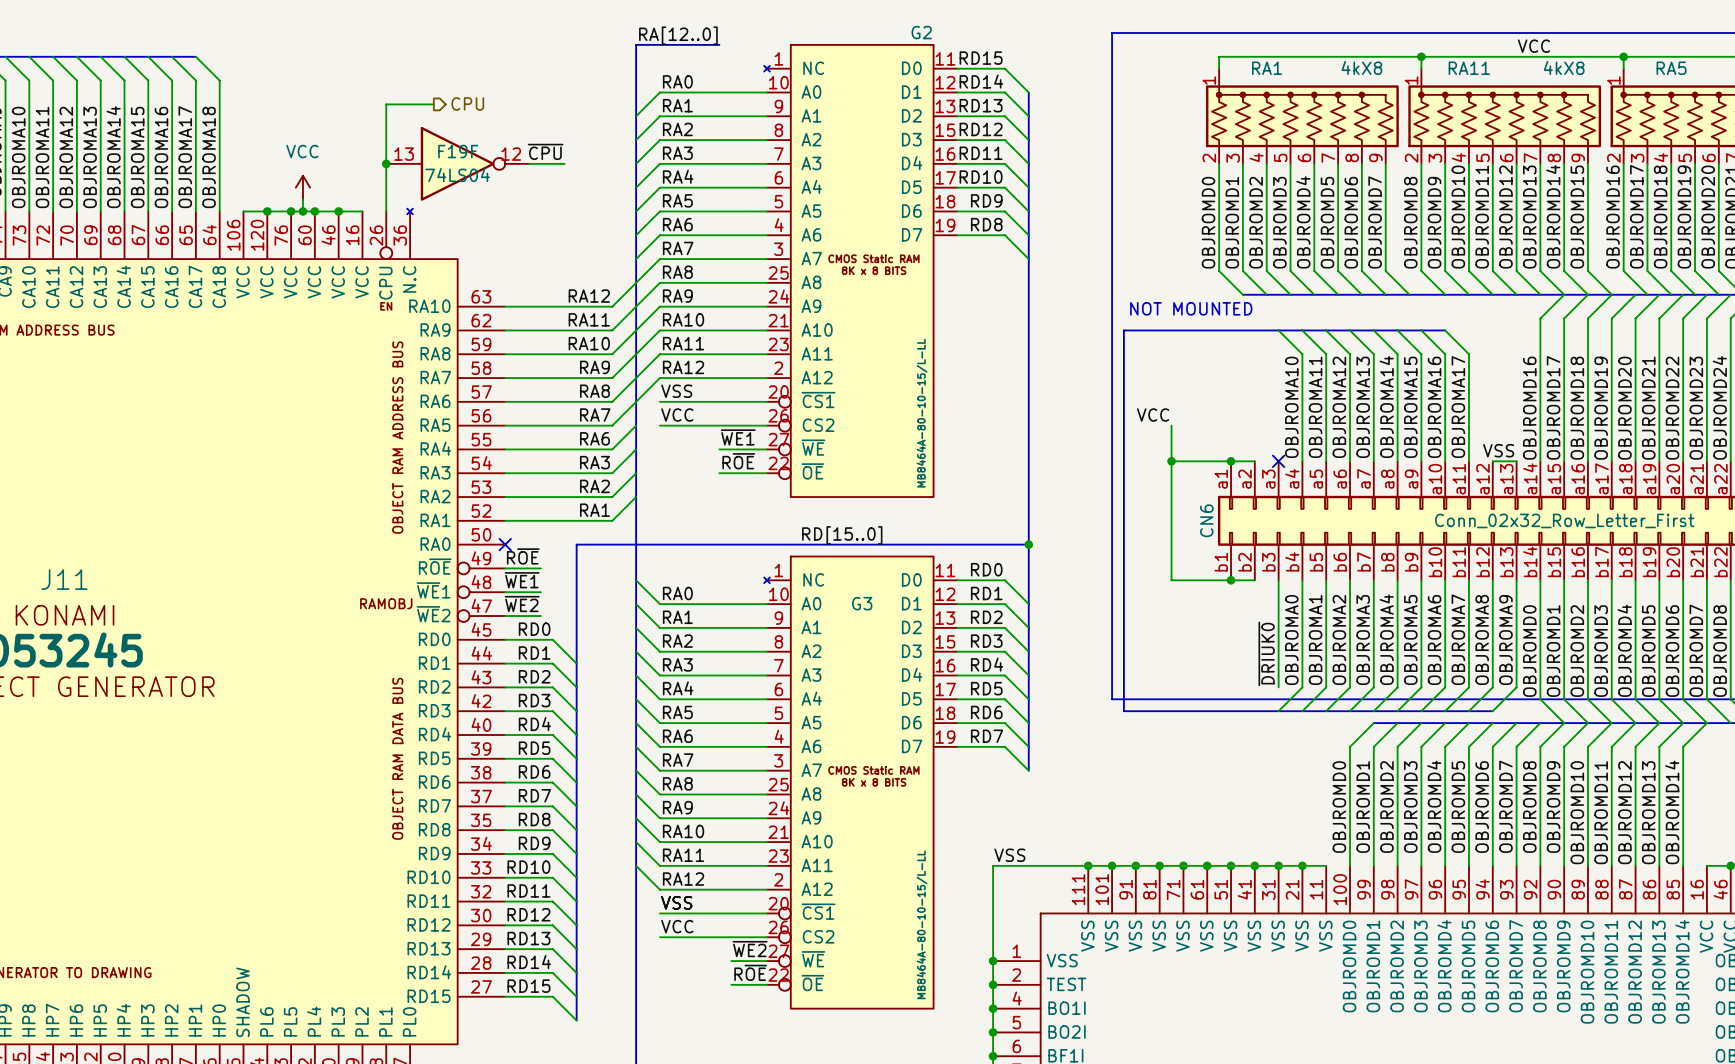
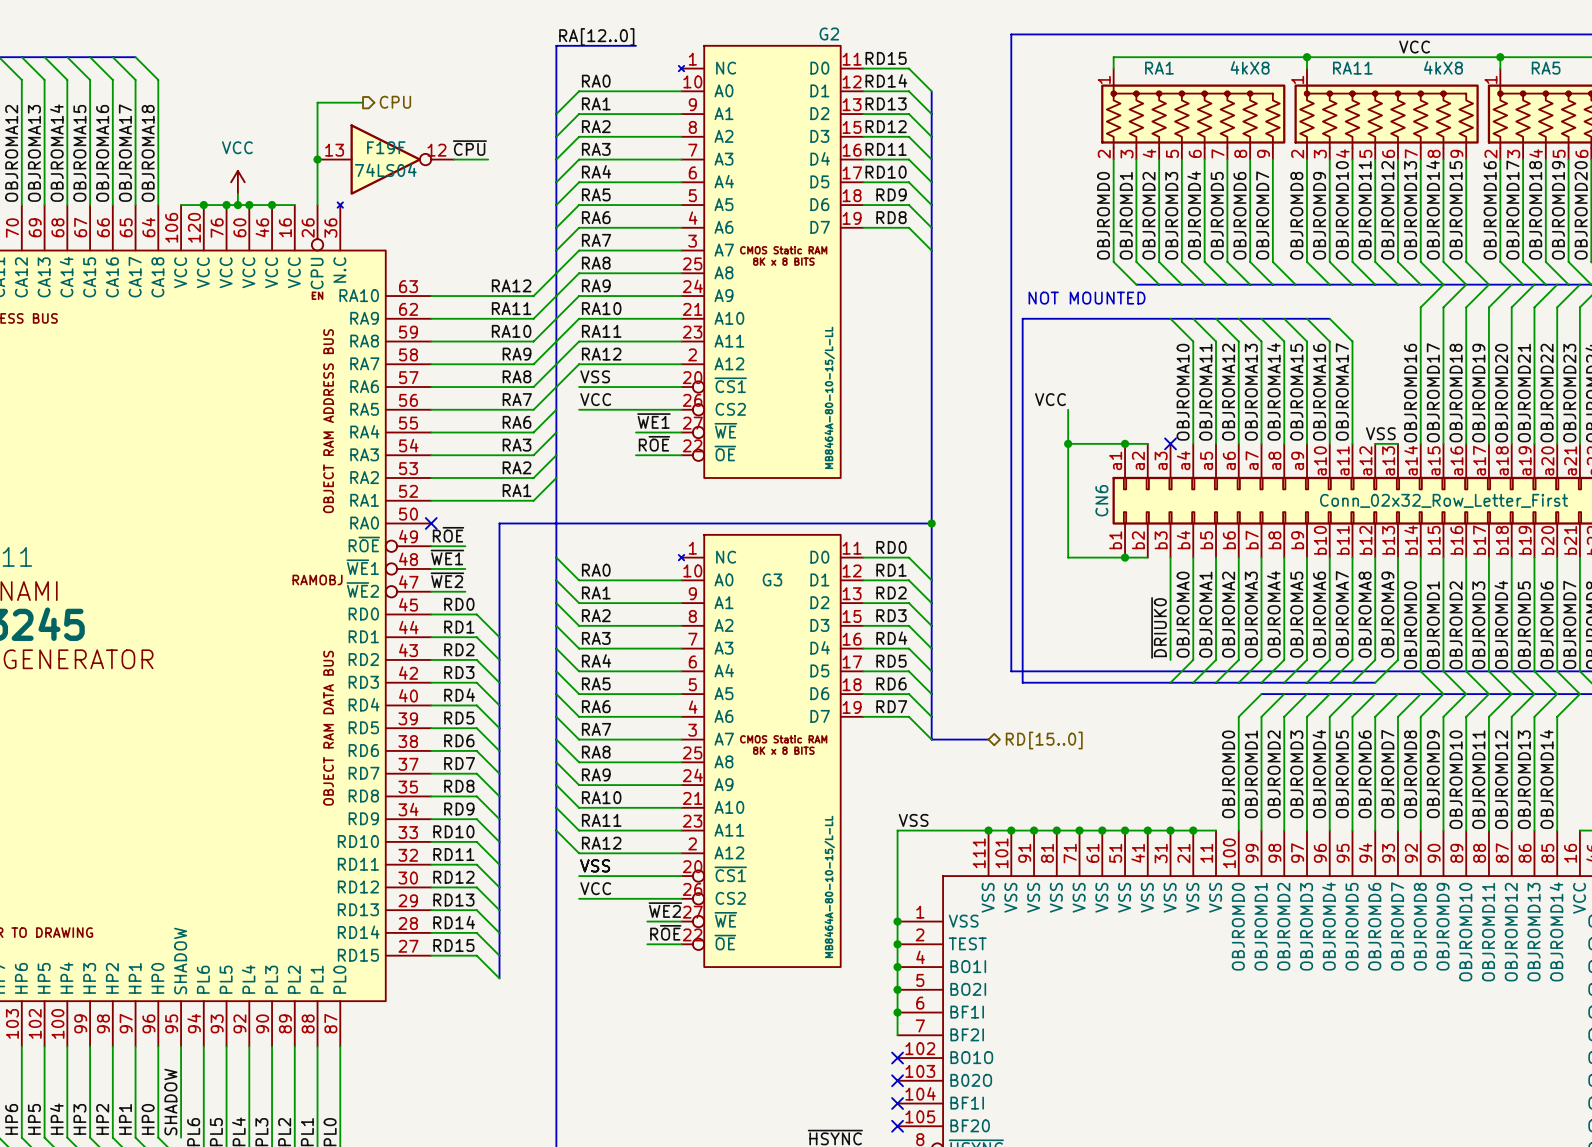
label: RD[15..0] (842, 535) -> none
bus: none -> (931, 739) (988, 739)
hierarchical label: none -> RD[15..0] (1044, 740)

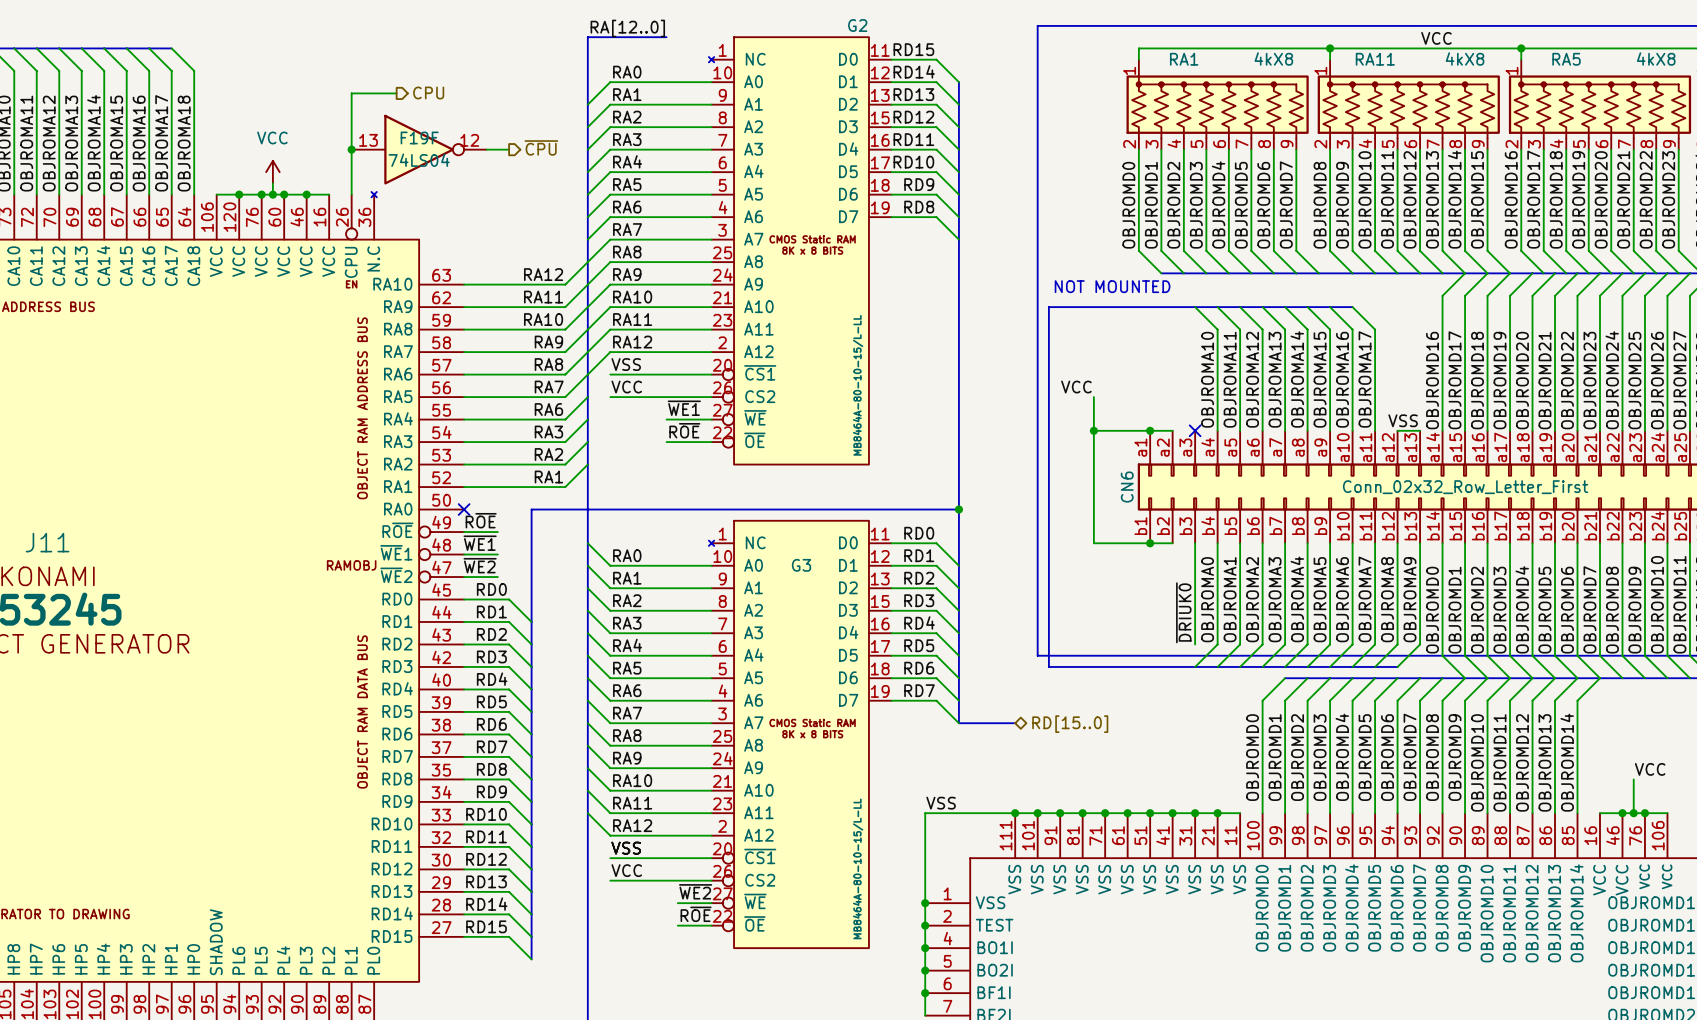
label: ~{CPU} (469, 148) -> none
hierarchical label: none -> ~{CPU} (541, 147)
wire: (476, 159) (488, 159) -> none

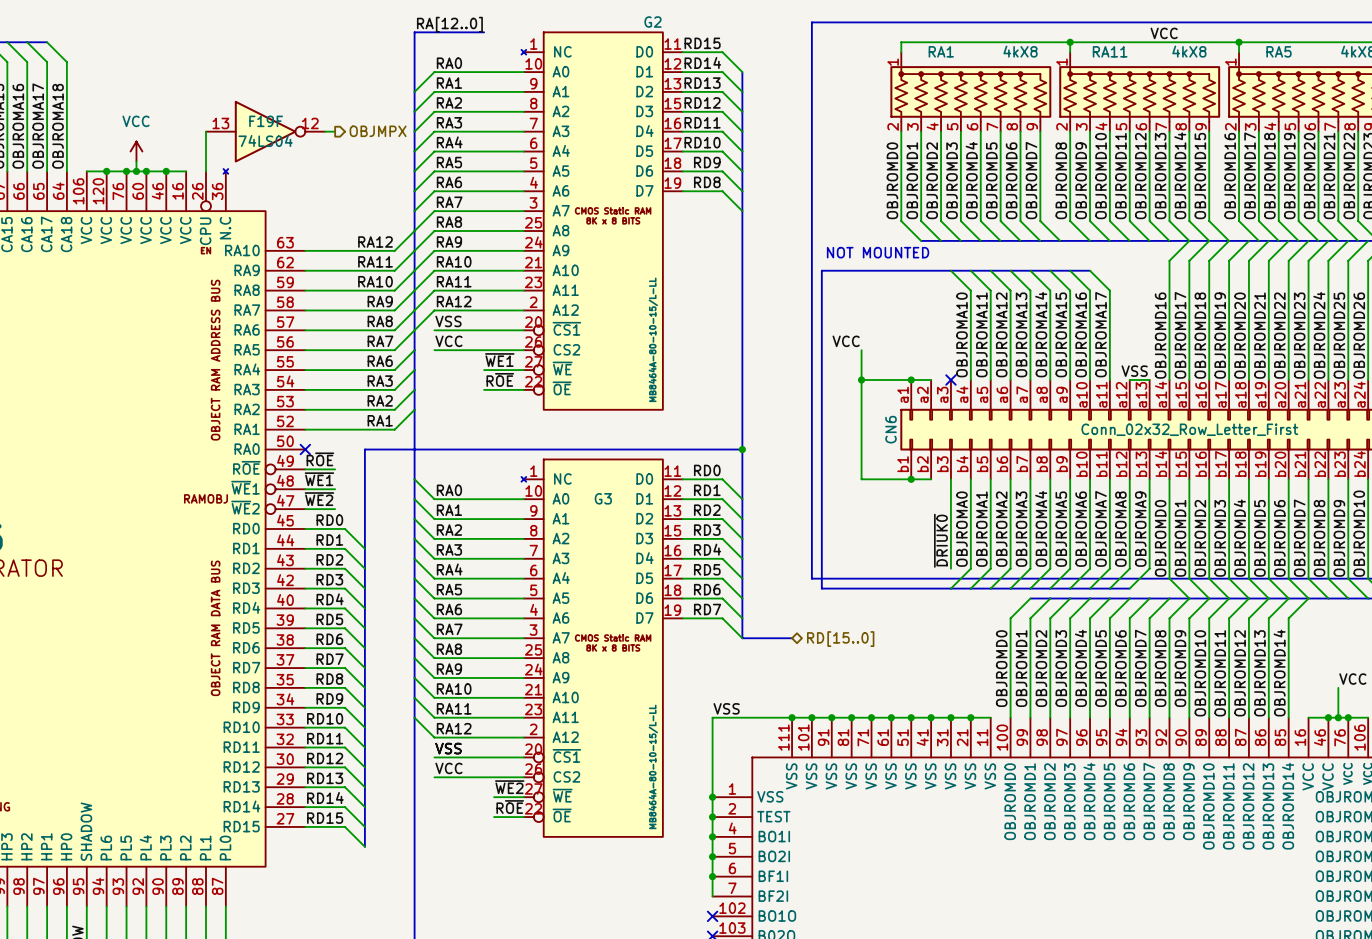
wire: (396, 93) (351, 93) (351, 149) -> none
hierarchical label: CPU (428, 93) -> none
hierarchical label: ~{CPU} (541, 147) -> none
junction: (351, 149) -> none
wire: (497, 149) (509, 149) -> none
hierarchical label: none -> OBJMPX (378, 131)

